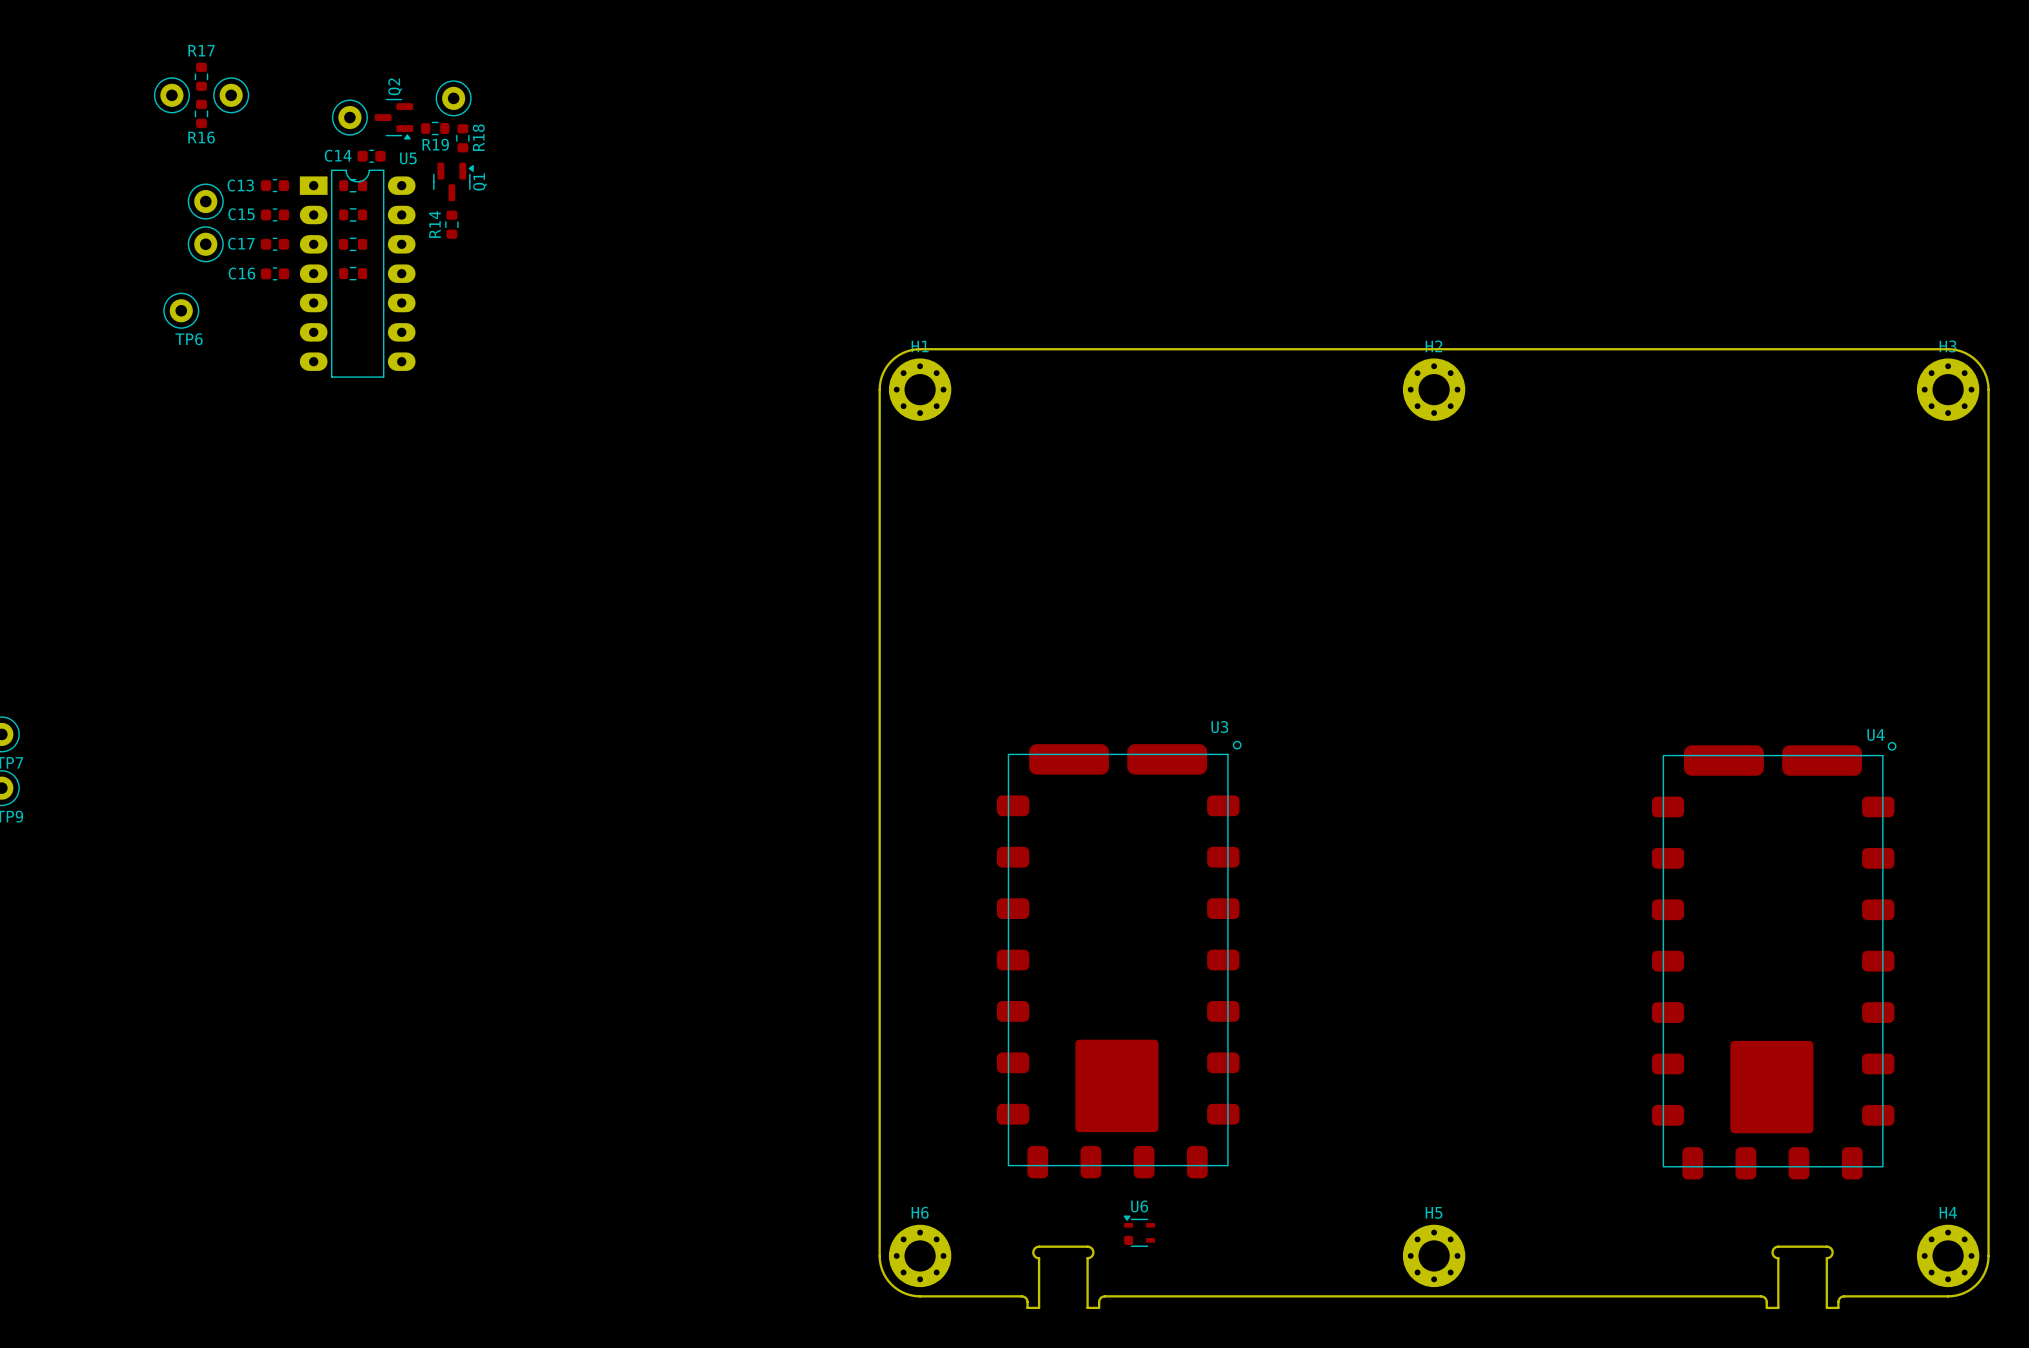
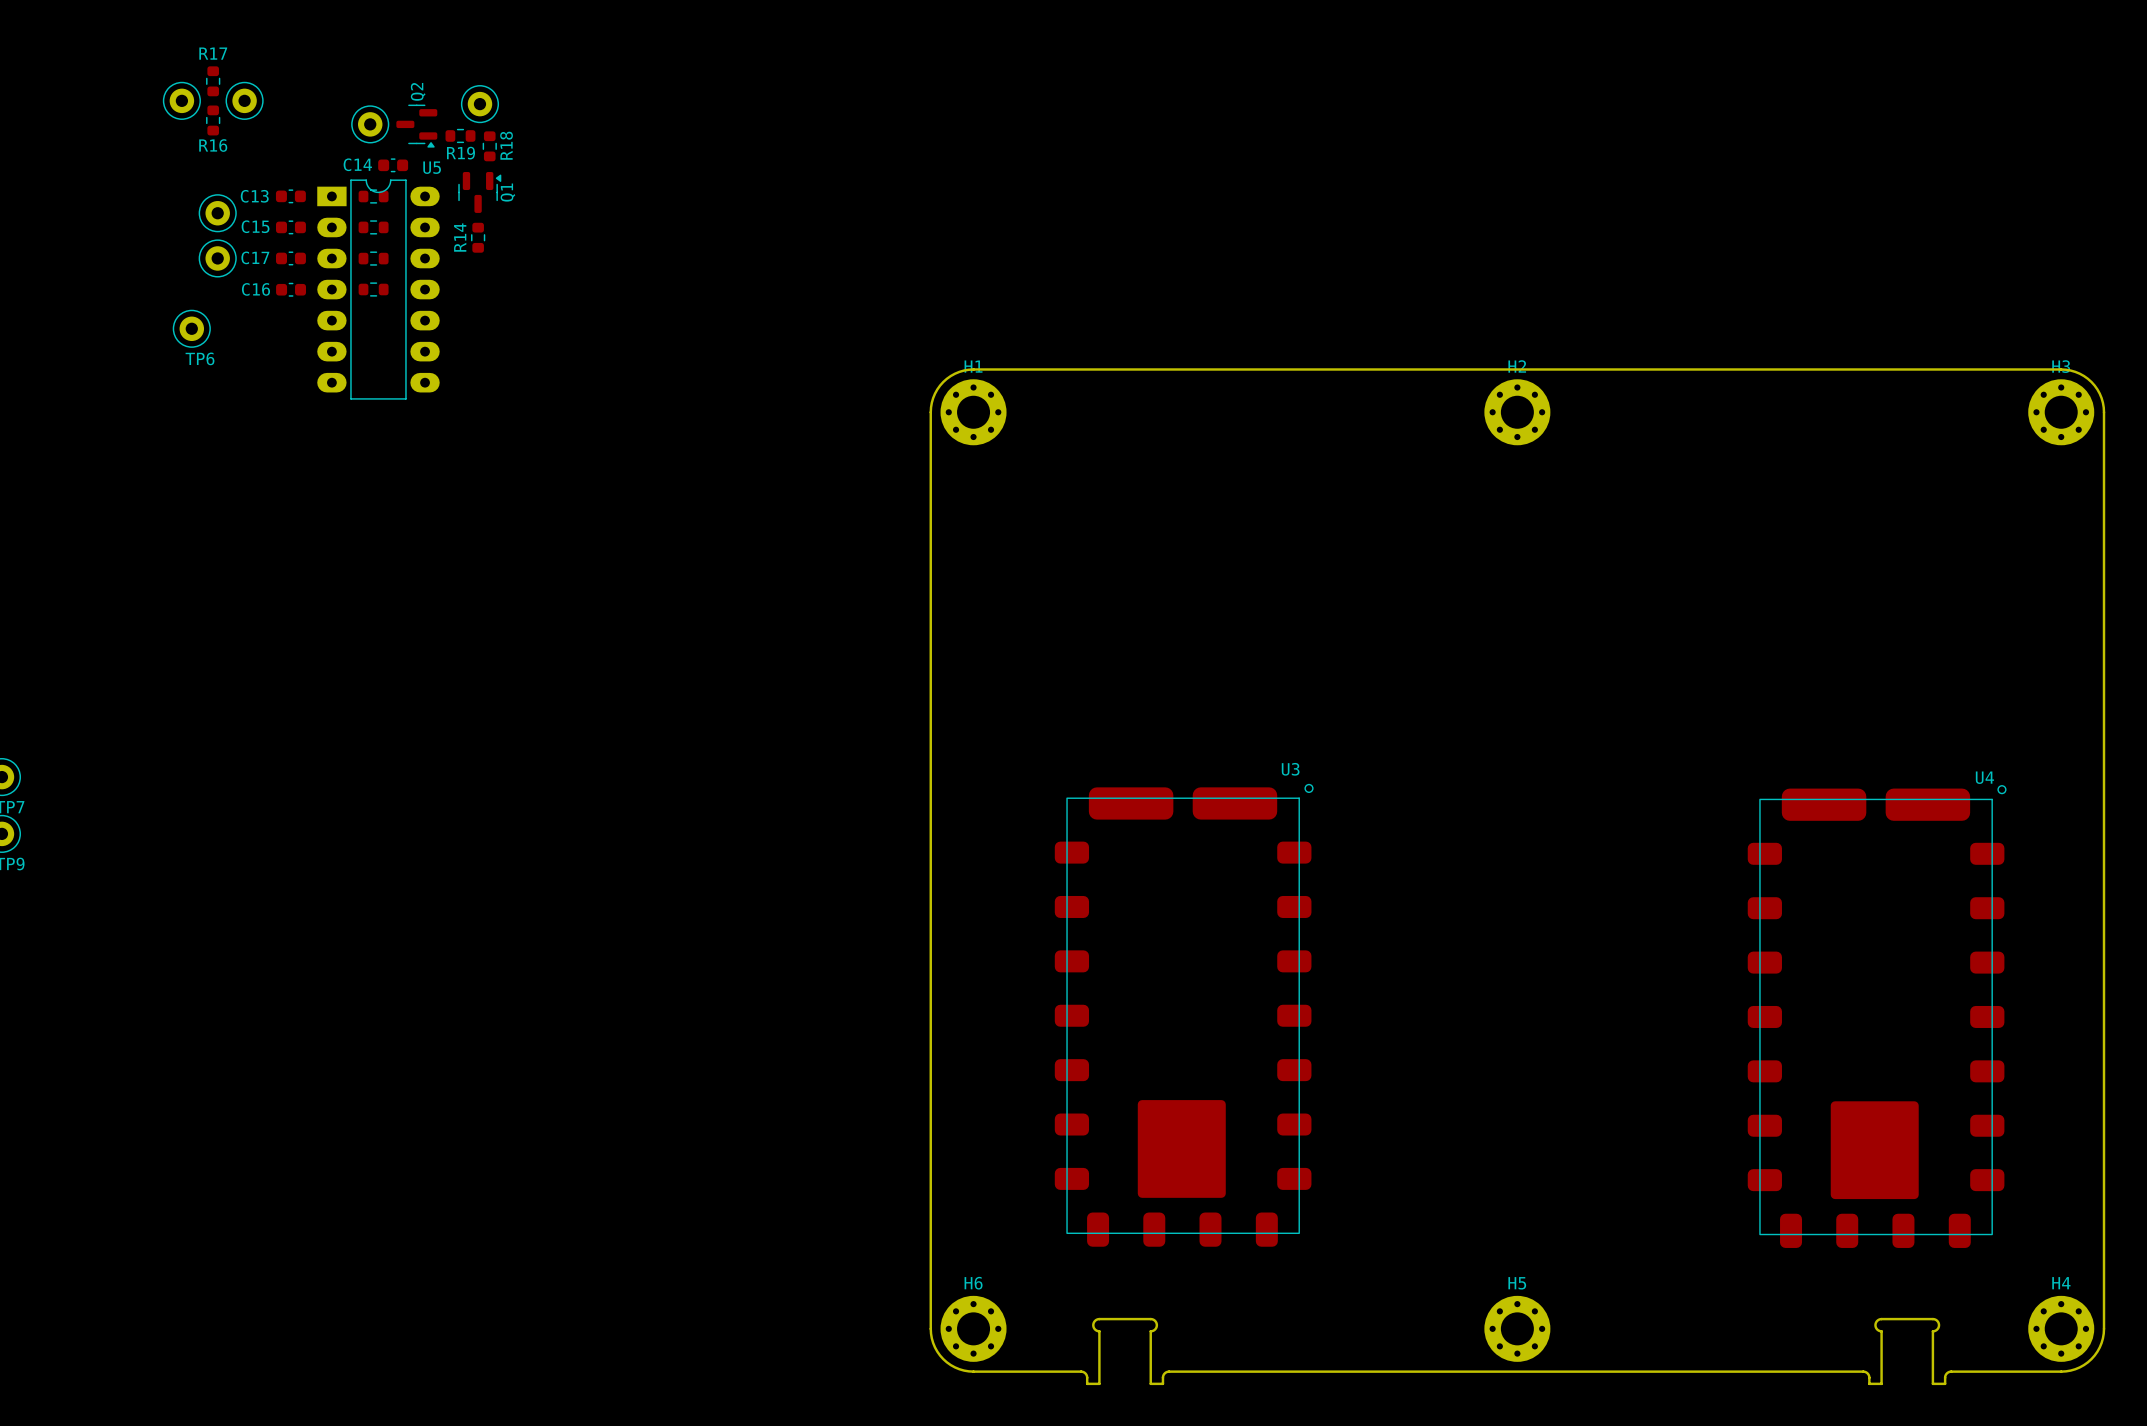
U6: (1139, 1231) -> none

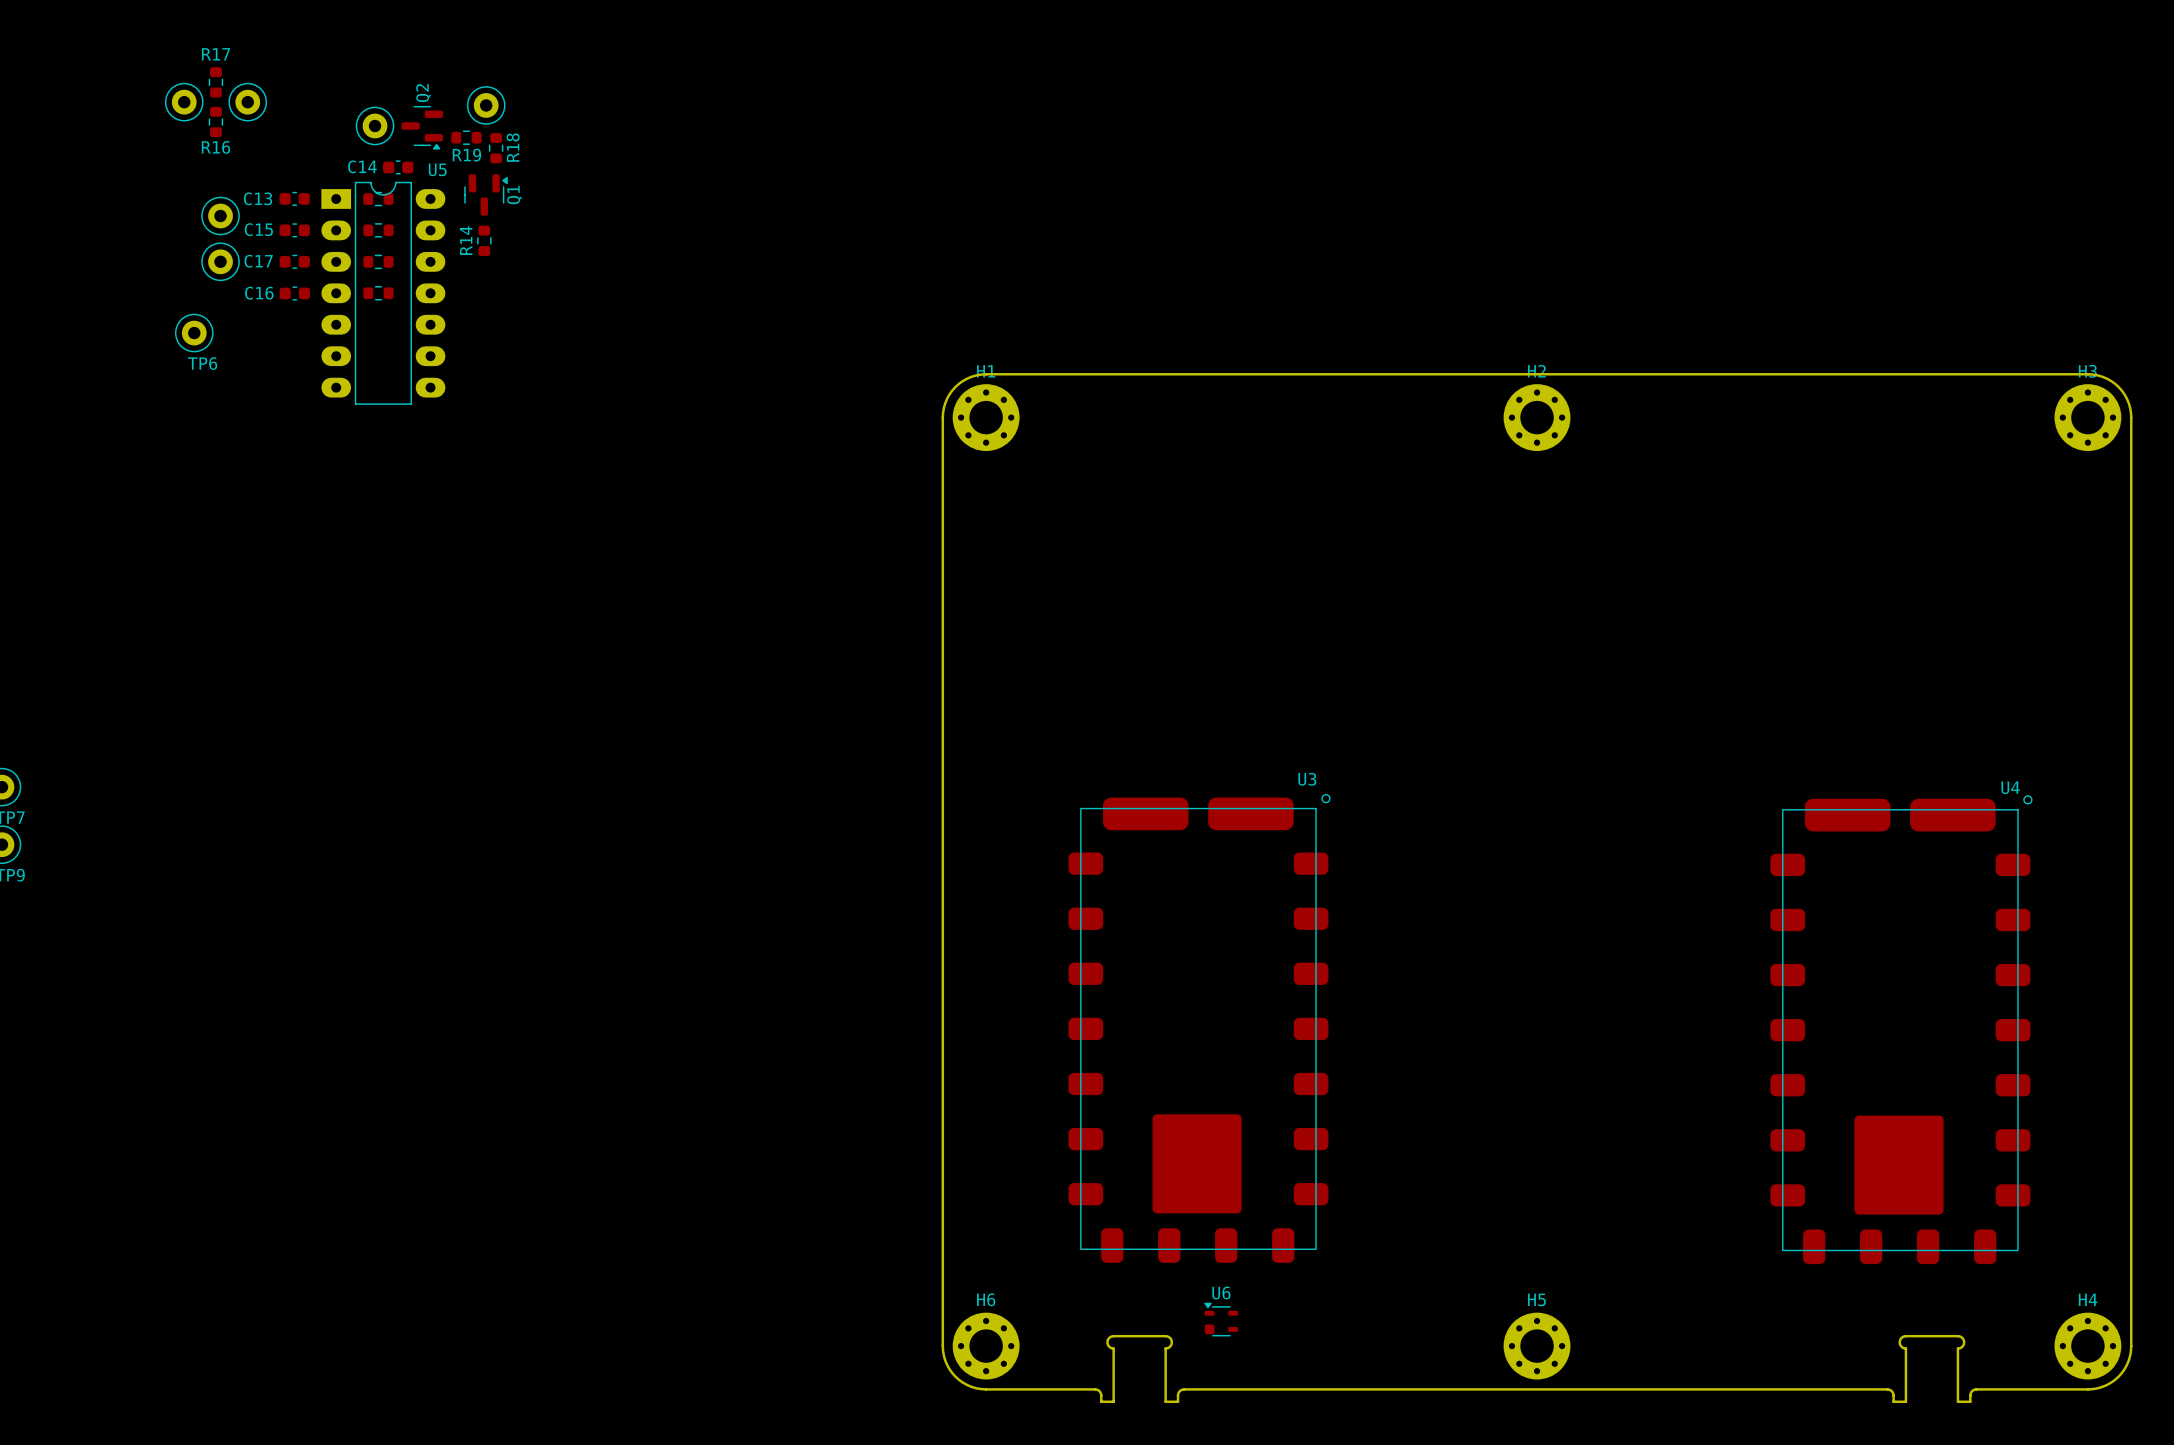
U6: none -> (1221, 1319)

